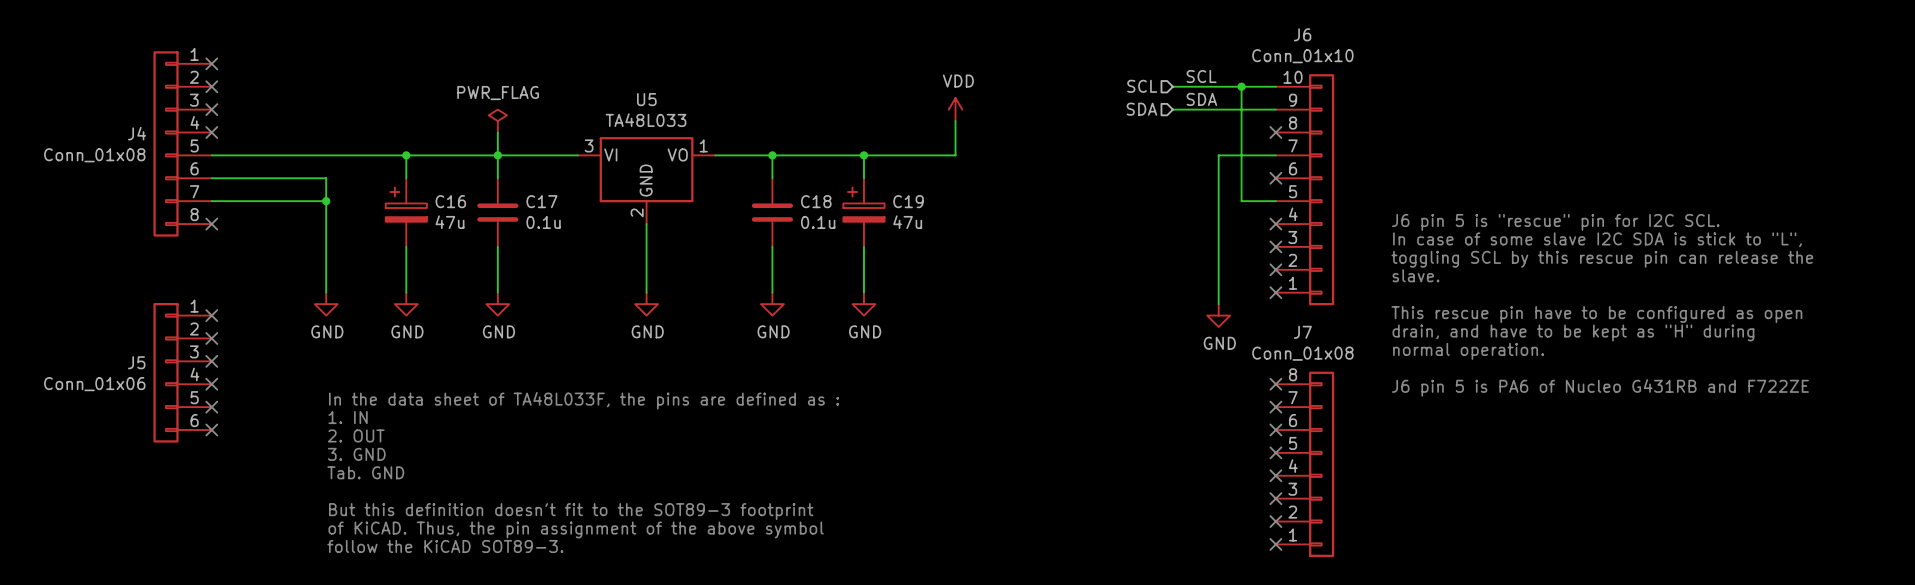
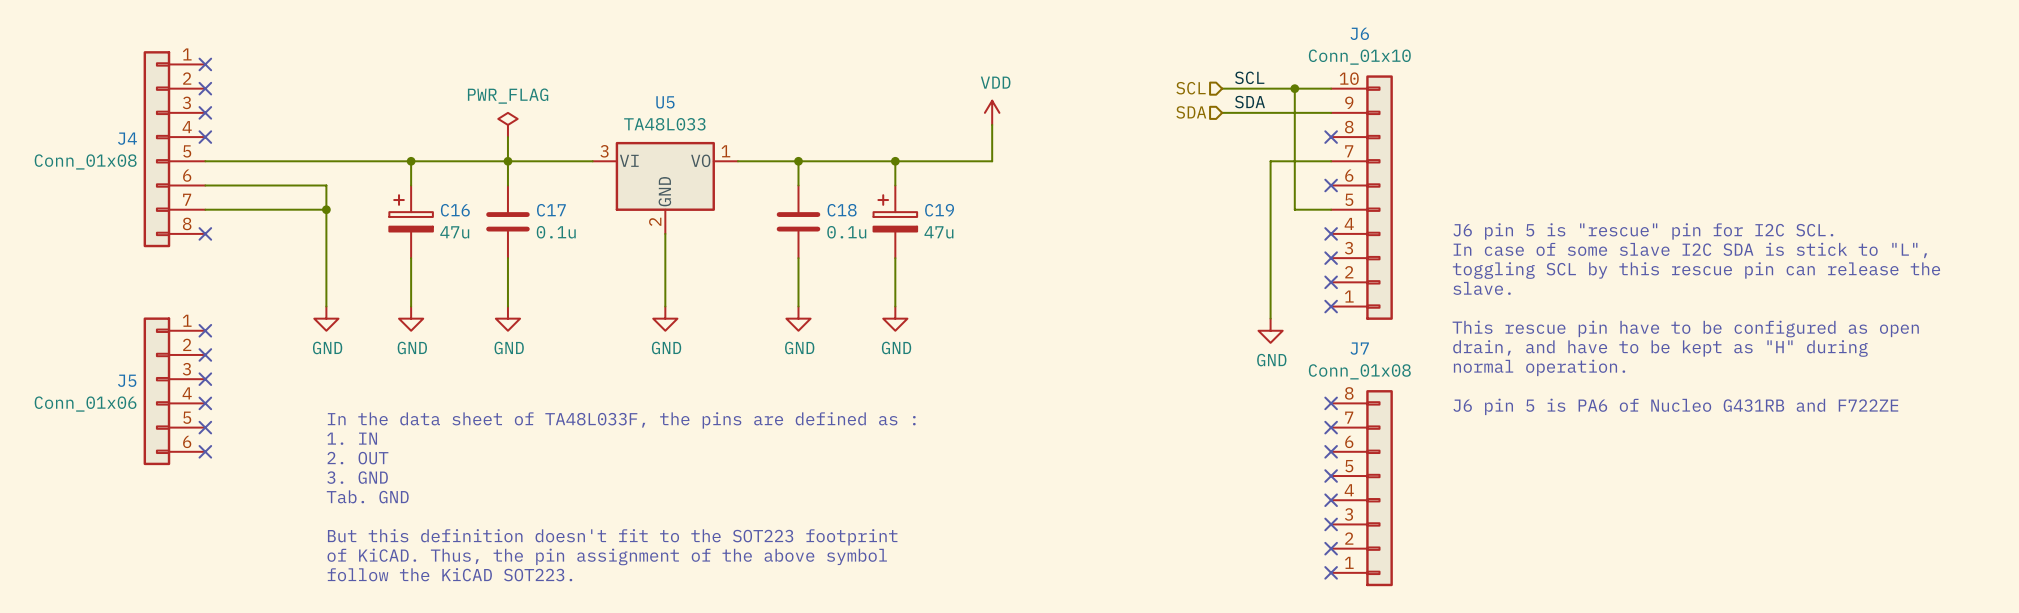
text: But this definition doesn't fit to the SOT89-3 footprint (571, 511) -> But this definition doesn't fit to the SOT223 footprint (612, 537)
text: follow the KiCAD SOT89-3. (445, 546) -> follow the KiCAD SOT223. (449, 574)

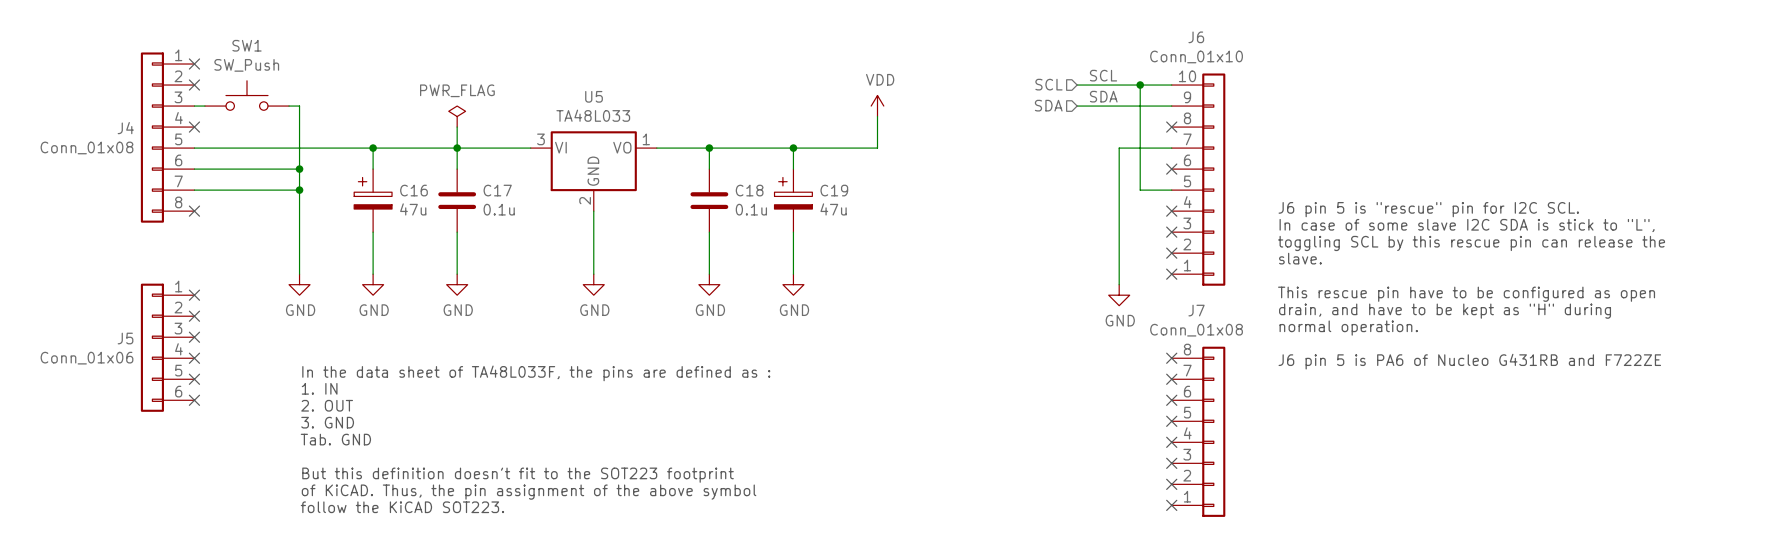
SW1: none -> SW_Push (246, 95)
wire: none -> (194, 106) (204, 106)
no-connect mark: (205, 112) -> none
wire: none -> (289, 106) (299, 106) (299, 169)
junction: none -> (299, 169)

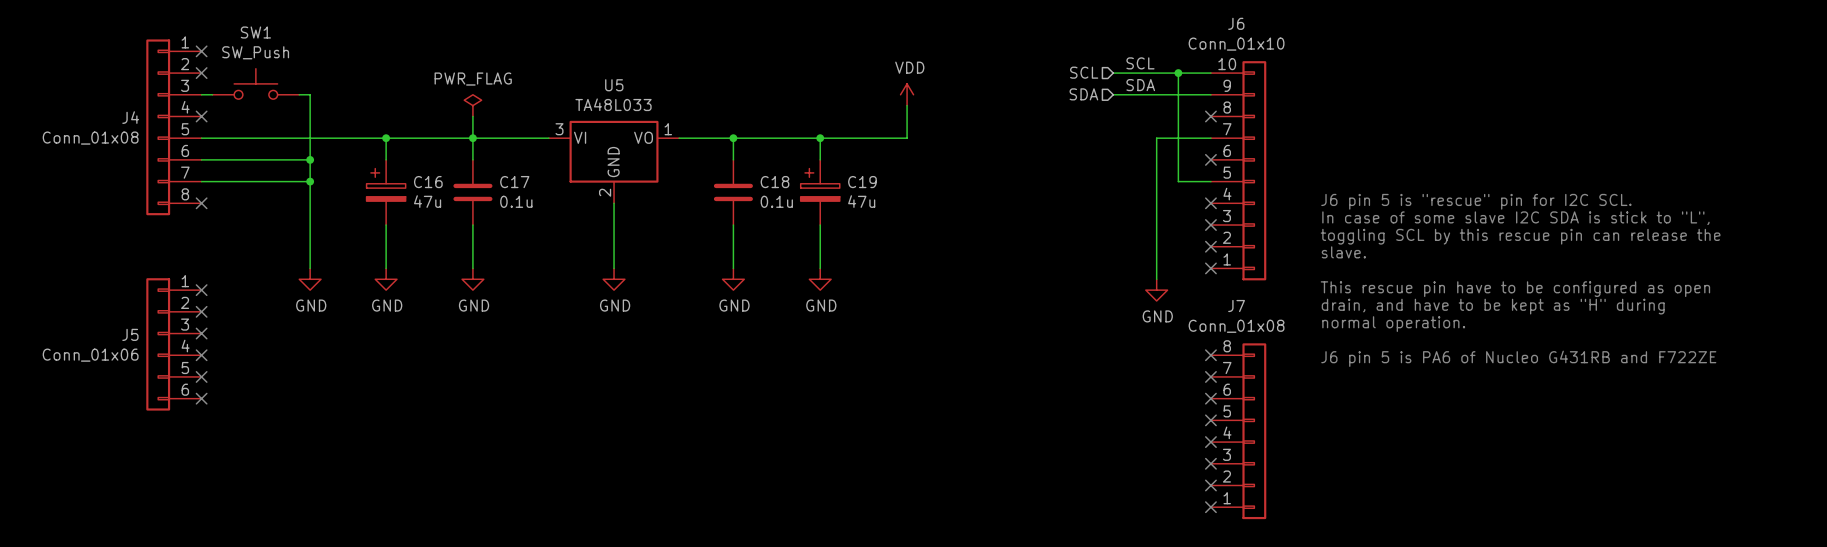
text: In the data sheet of TA48L033F, the pins are defined as : (536, 373) -> none
text: 1. IN (319, 388) -> none
text: 2. OUT (327, 405) -> none
text: 3. GND (327, 422) -> none
text: Tab. GND (335, 439) -> none
text: But this definition doesn't fit to the SOT223 footprint (518, 475) -> none
text: of KiCAD. Thus, the pin assignment of the above symbol (529, 492) -> none
text: follow the KiCAD SOT223. (402, 507) -> none

